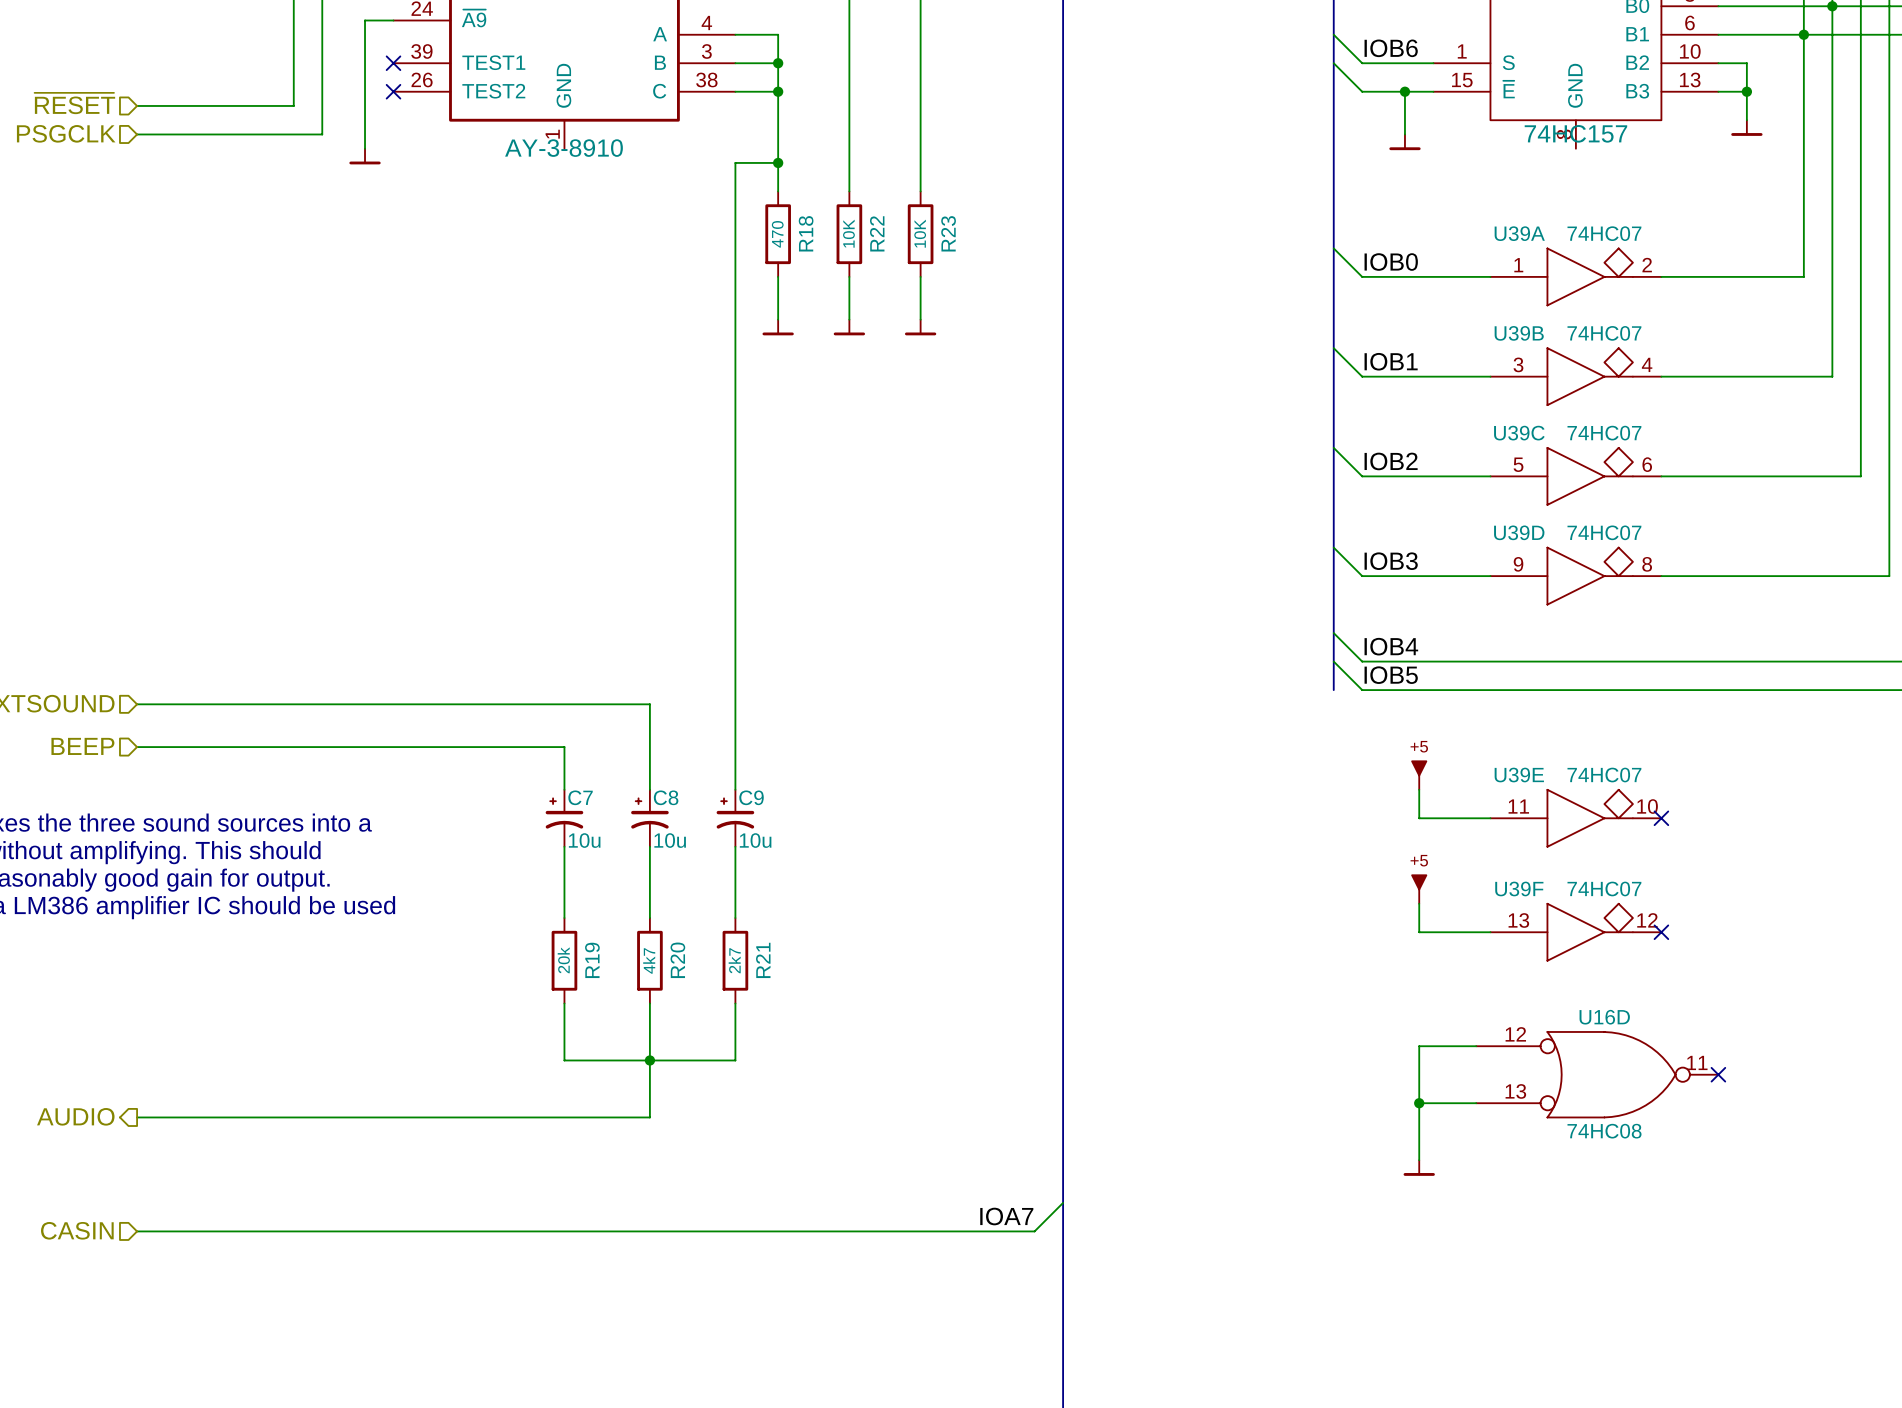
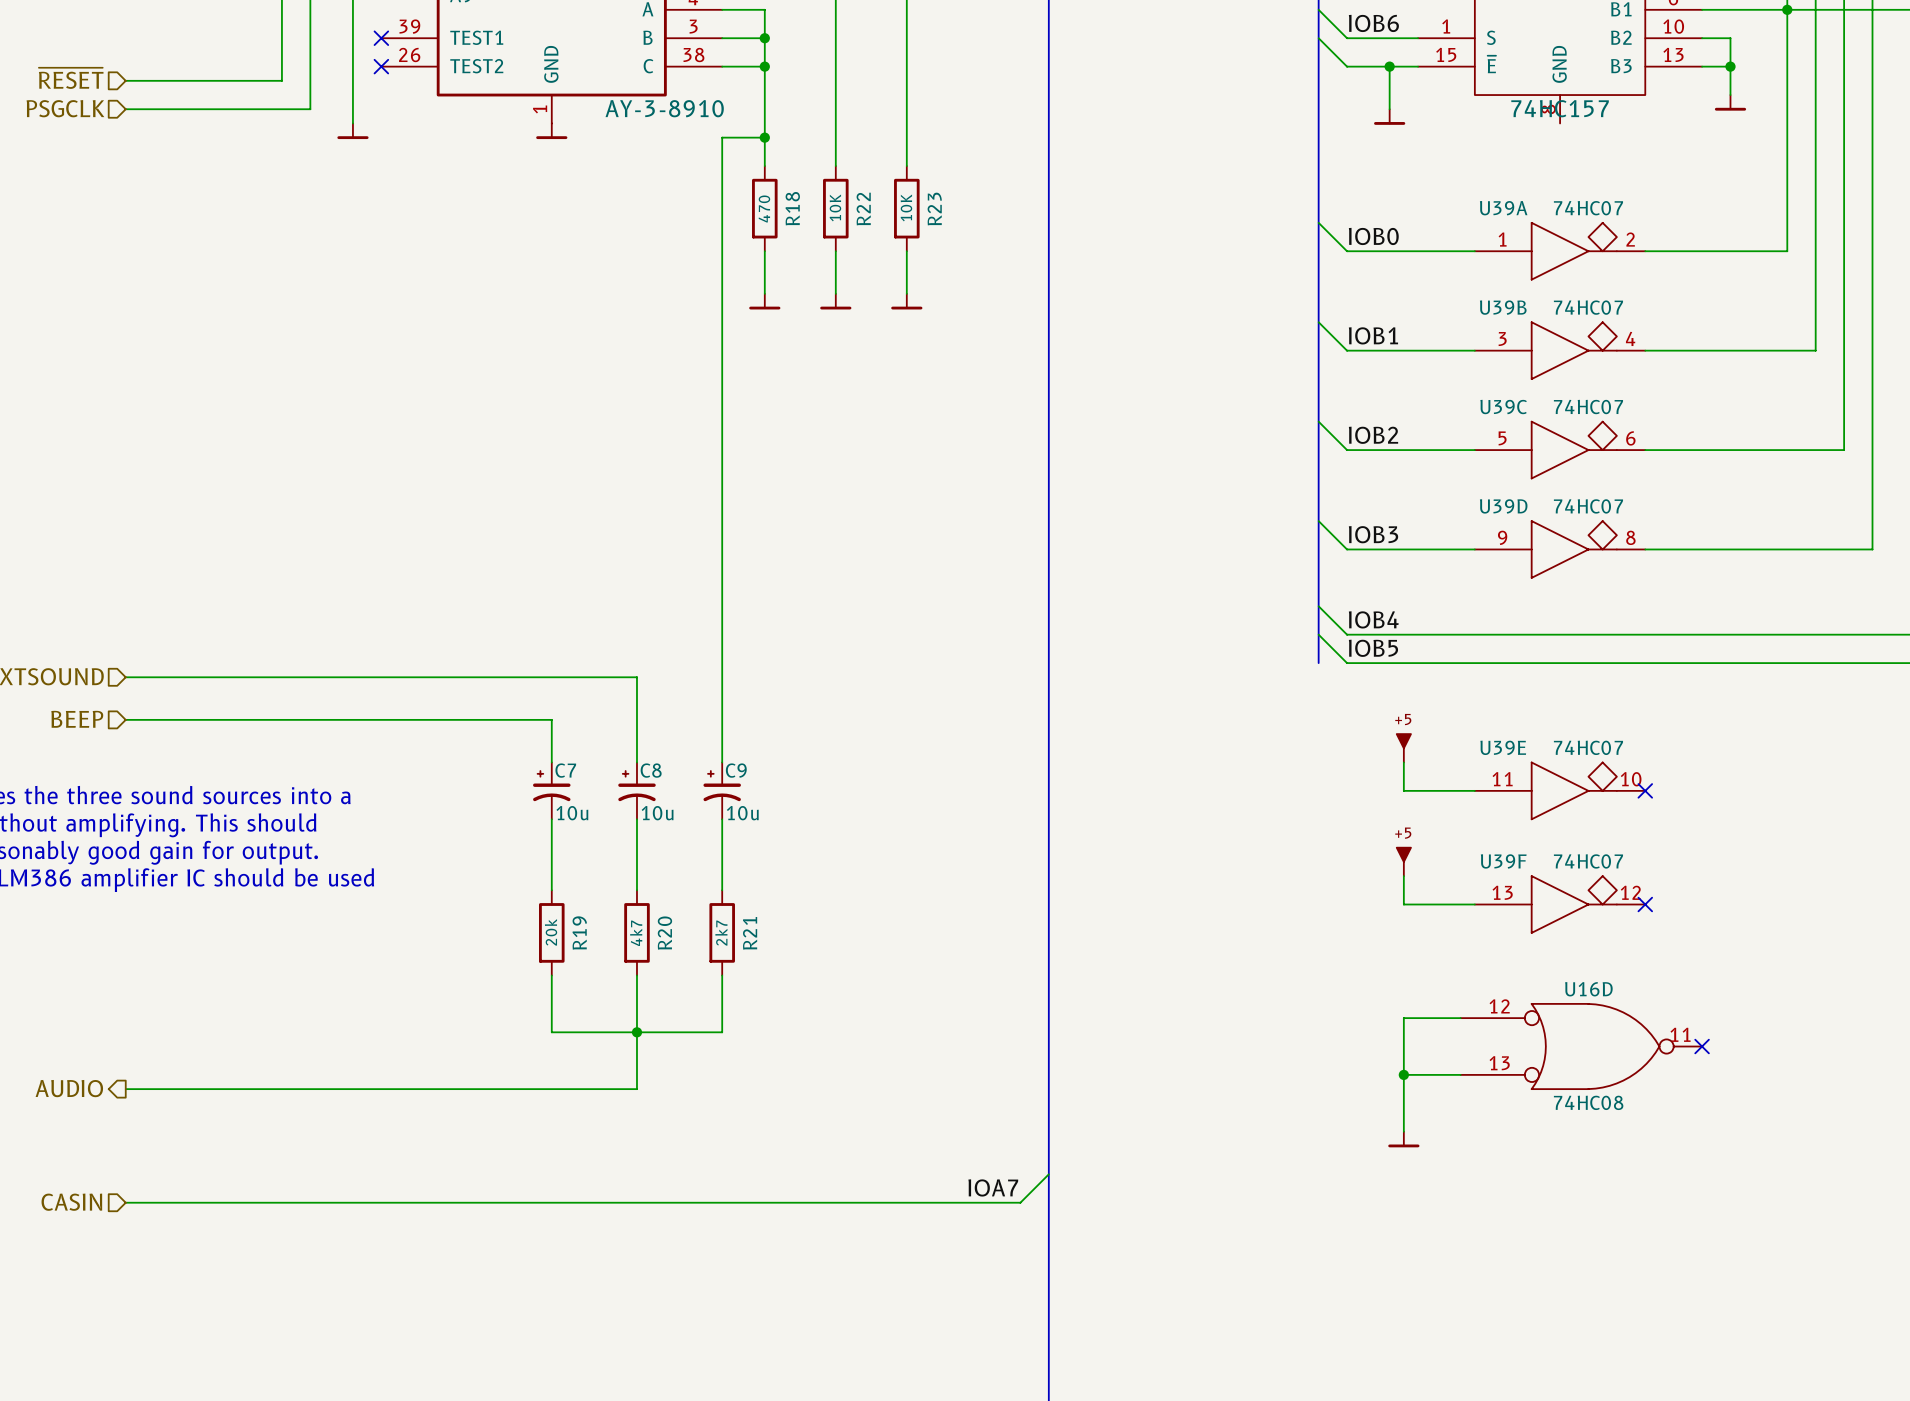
part value position: AY-3-8910 (563, 148) -> AY-3-8910 (664, 108)
power symbol: none -> (551, 131)

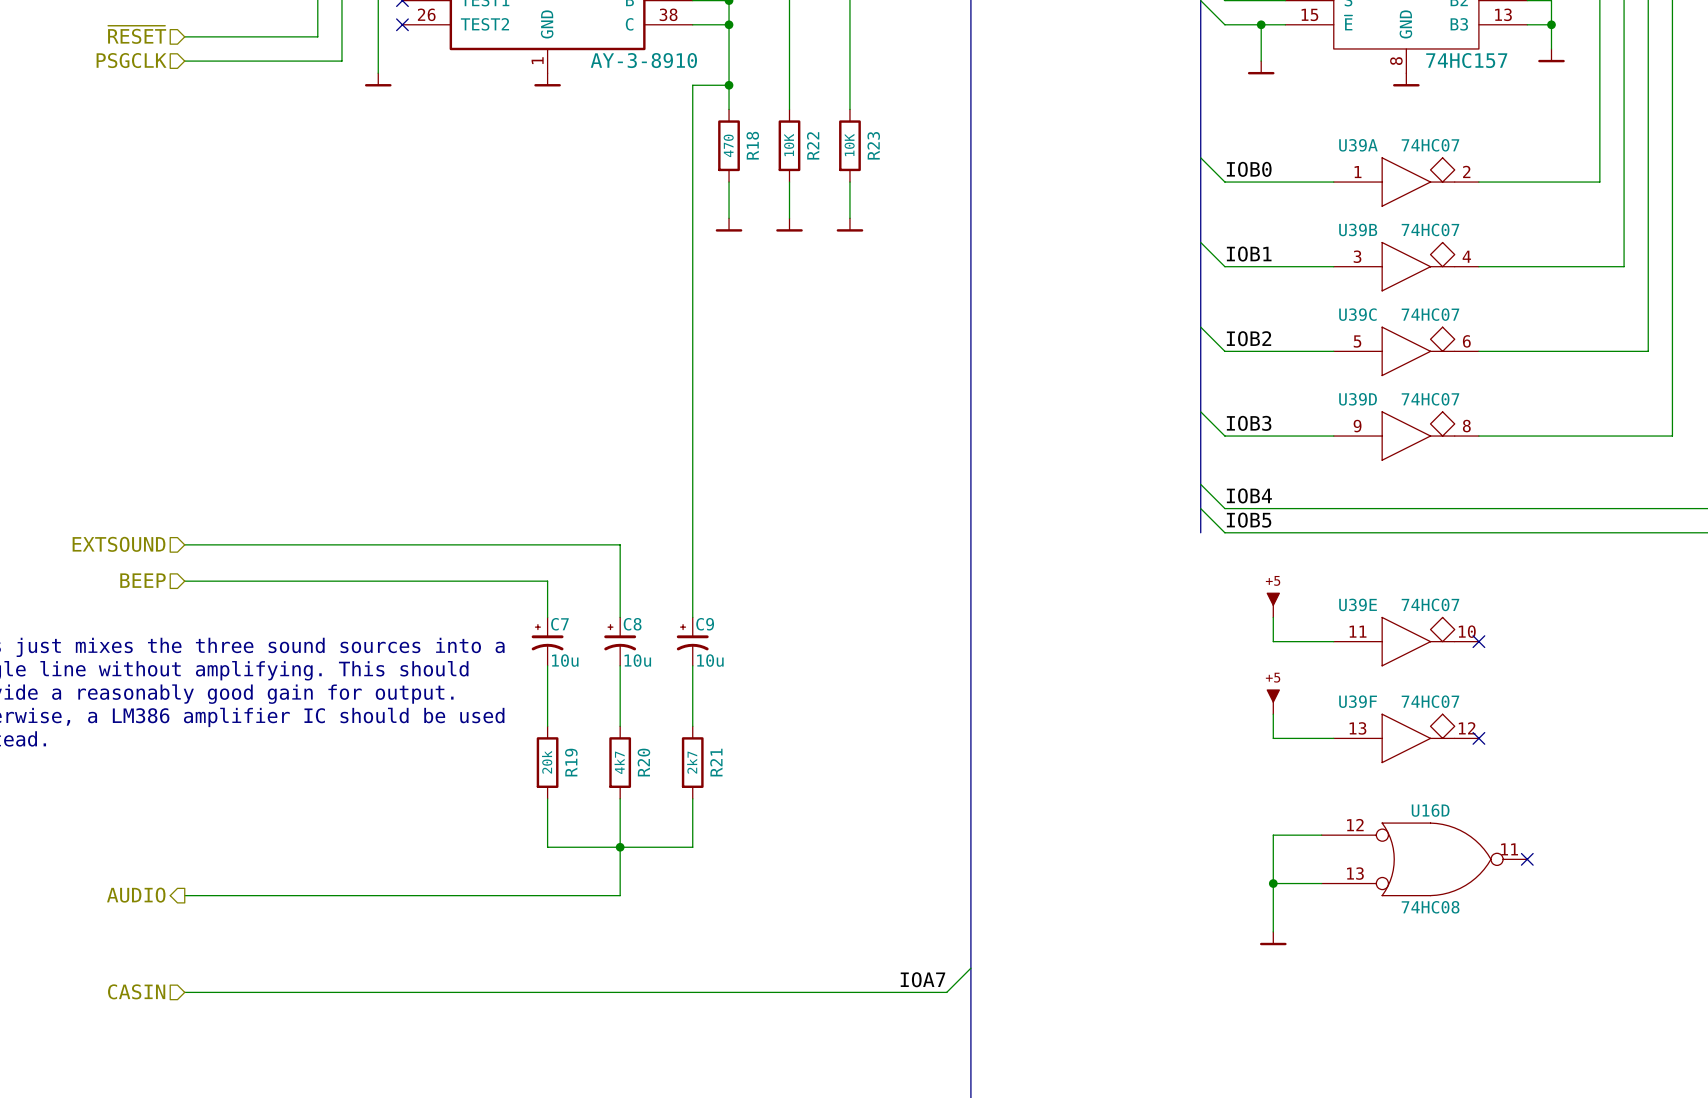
part value position: 74HC157 (1560, 108) -> 74HC157 (1466, 60)
power symbol: none -> (1406, 79)

